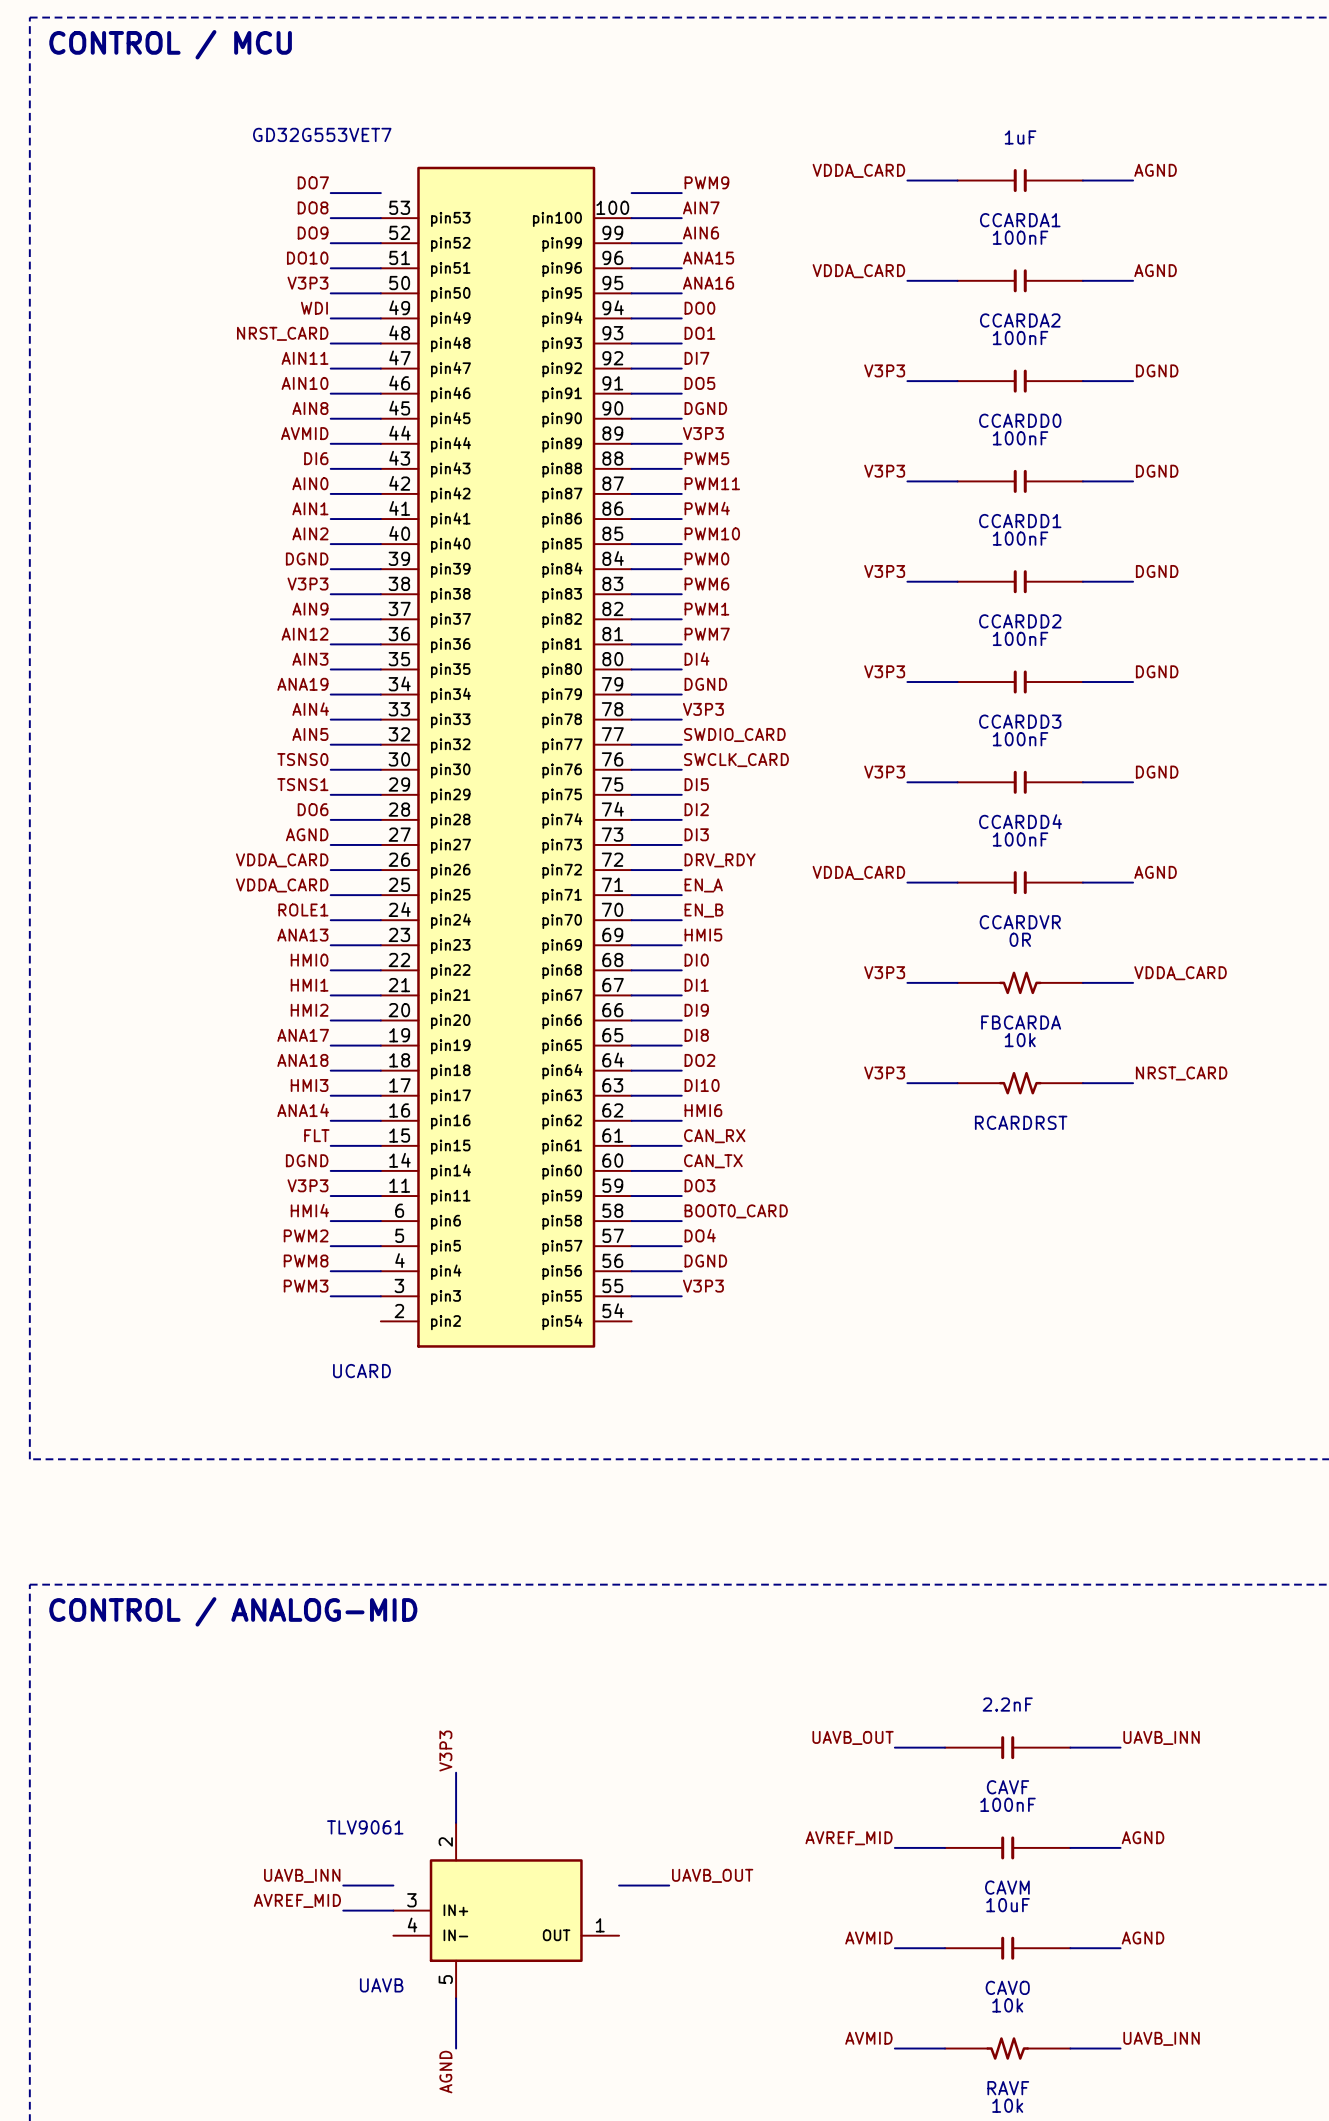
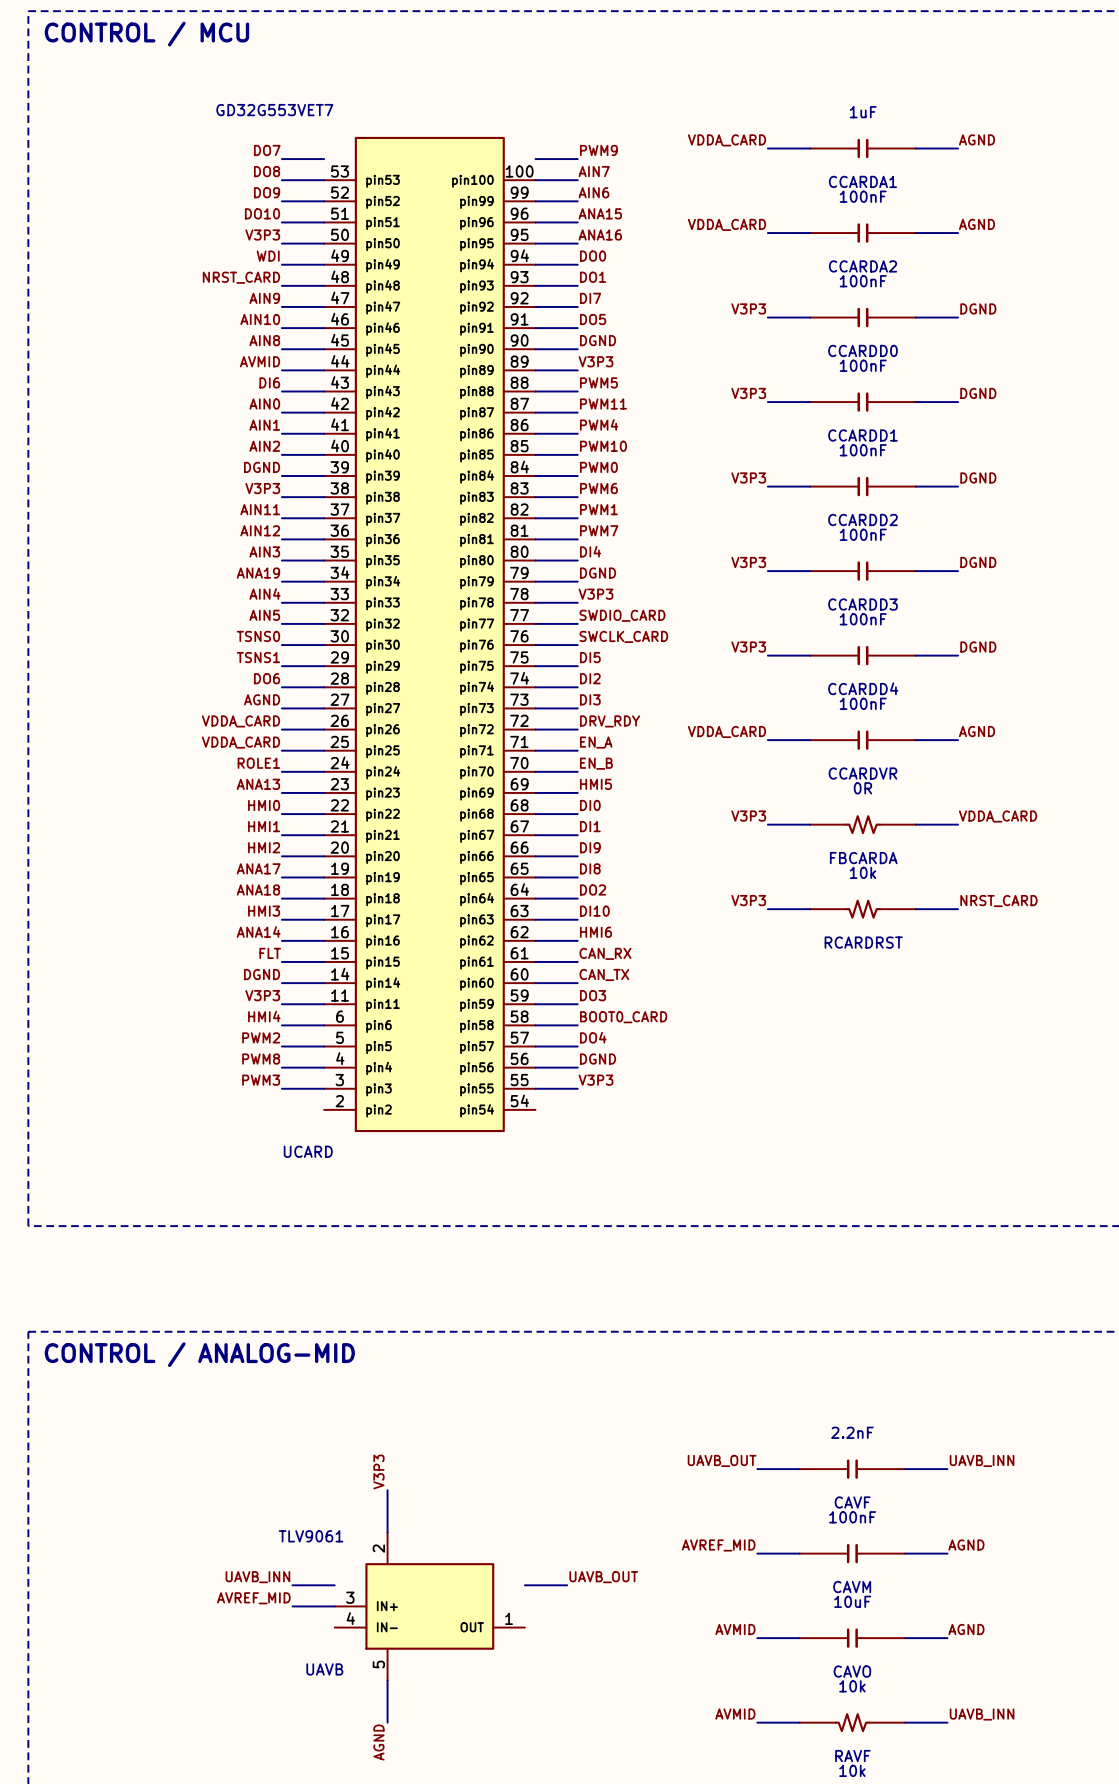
label: AIN11 (305, 358) -> AIN9 (264, 298)
label: AIN9 (310, 609) -> AIN11 (260, 509)

